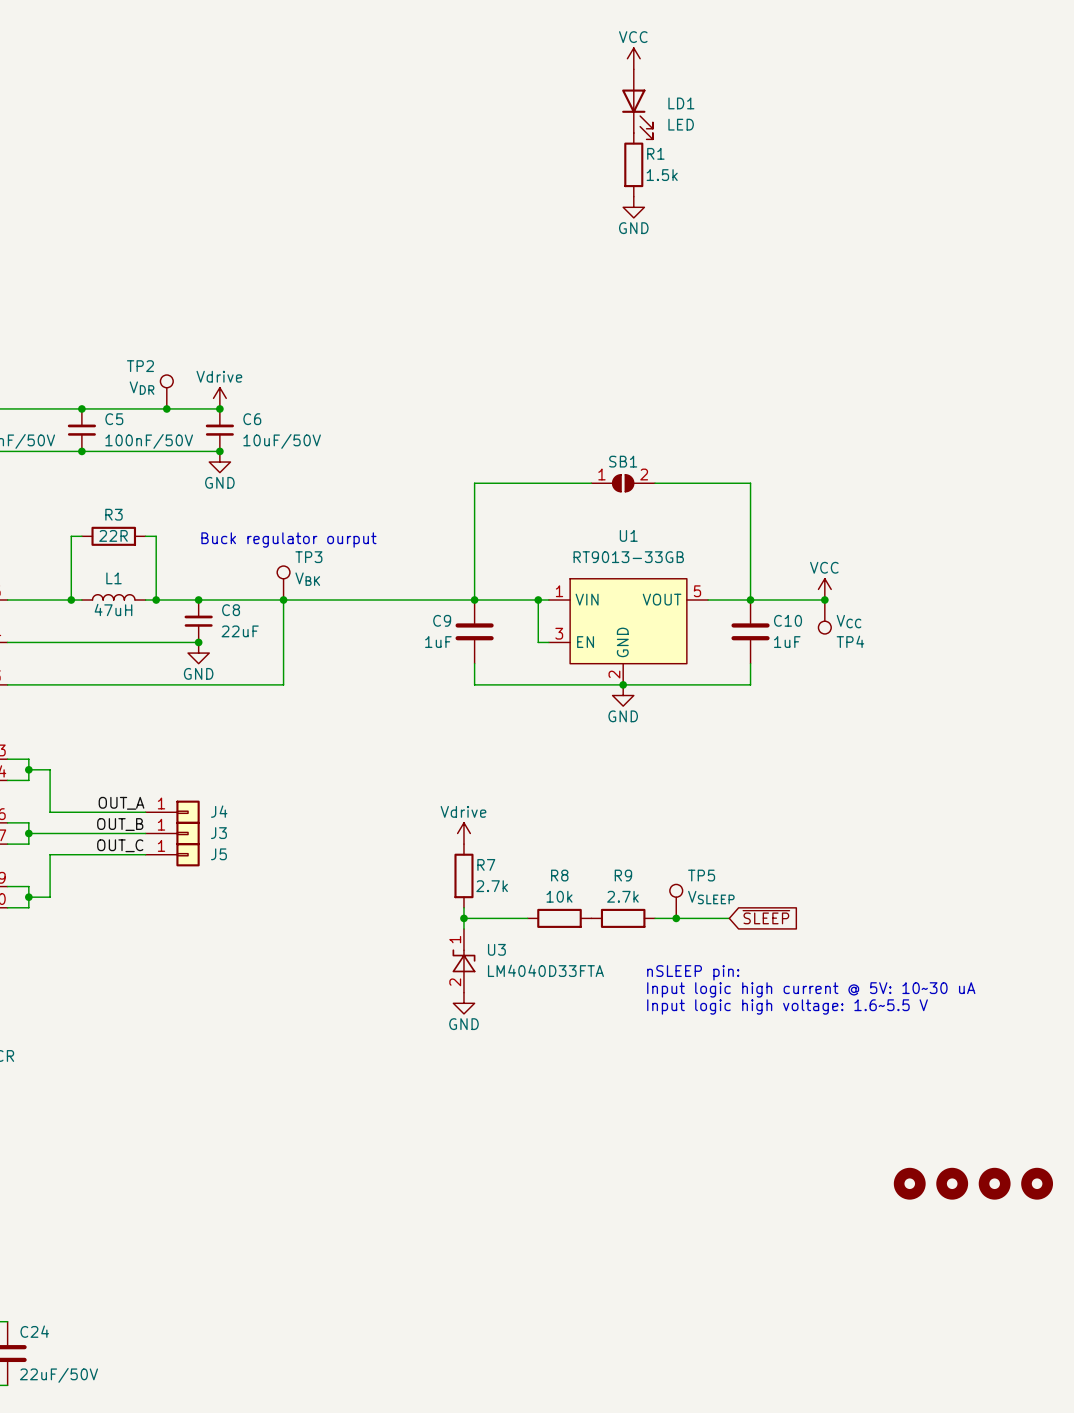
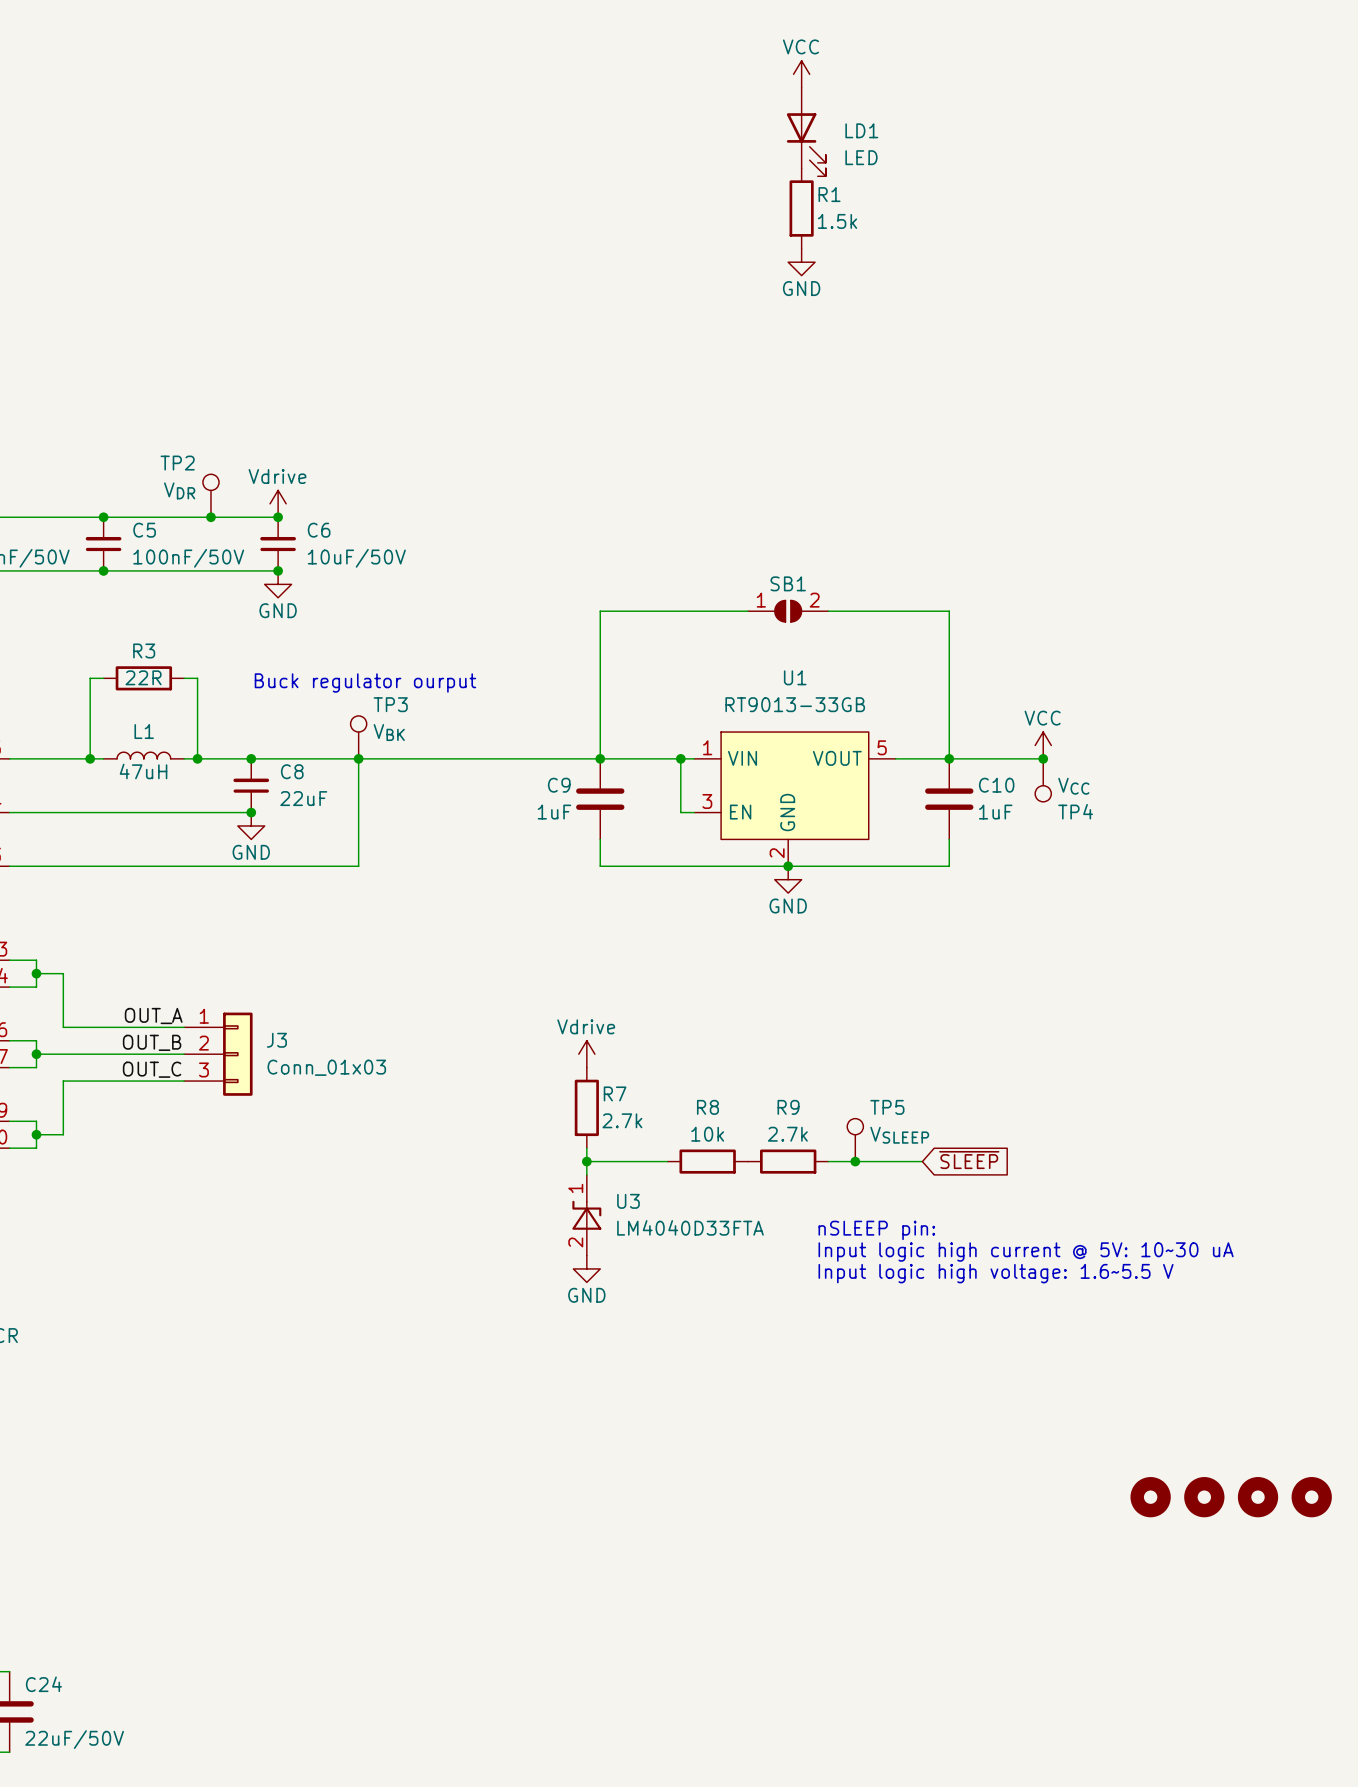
J4: (172, 812) -> none
J3 symbol: [145, 821, 200, 846] -> [184, 1012, 253, 1096]
J3 value: none -> Conn_01x03 (326, 1067)
J5: (172, 854) -> none

